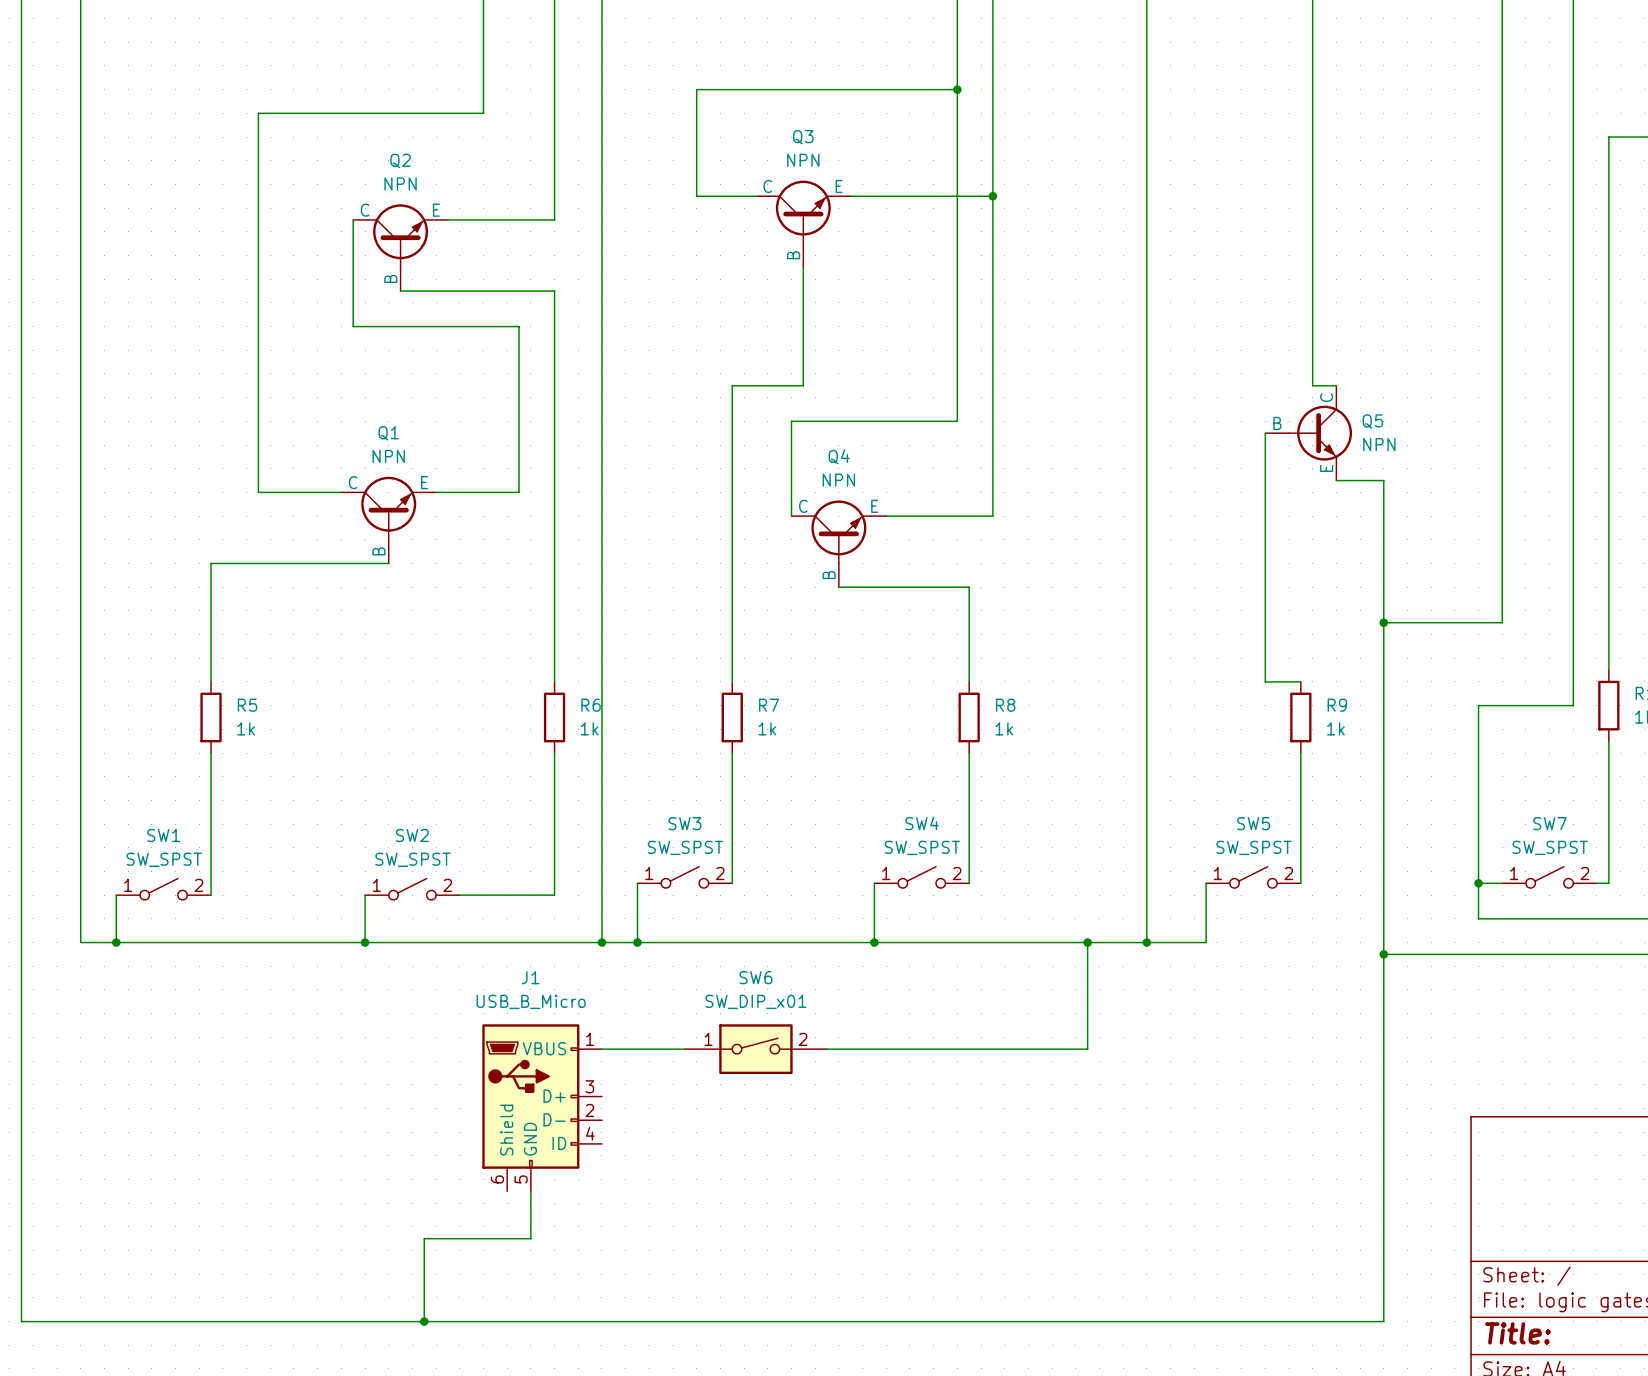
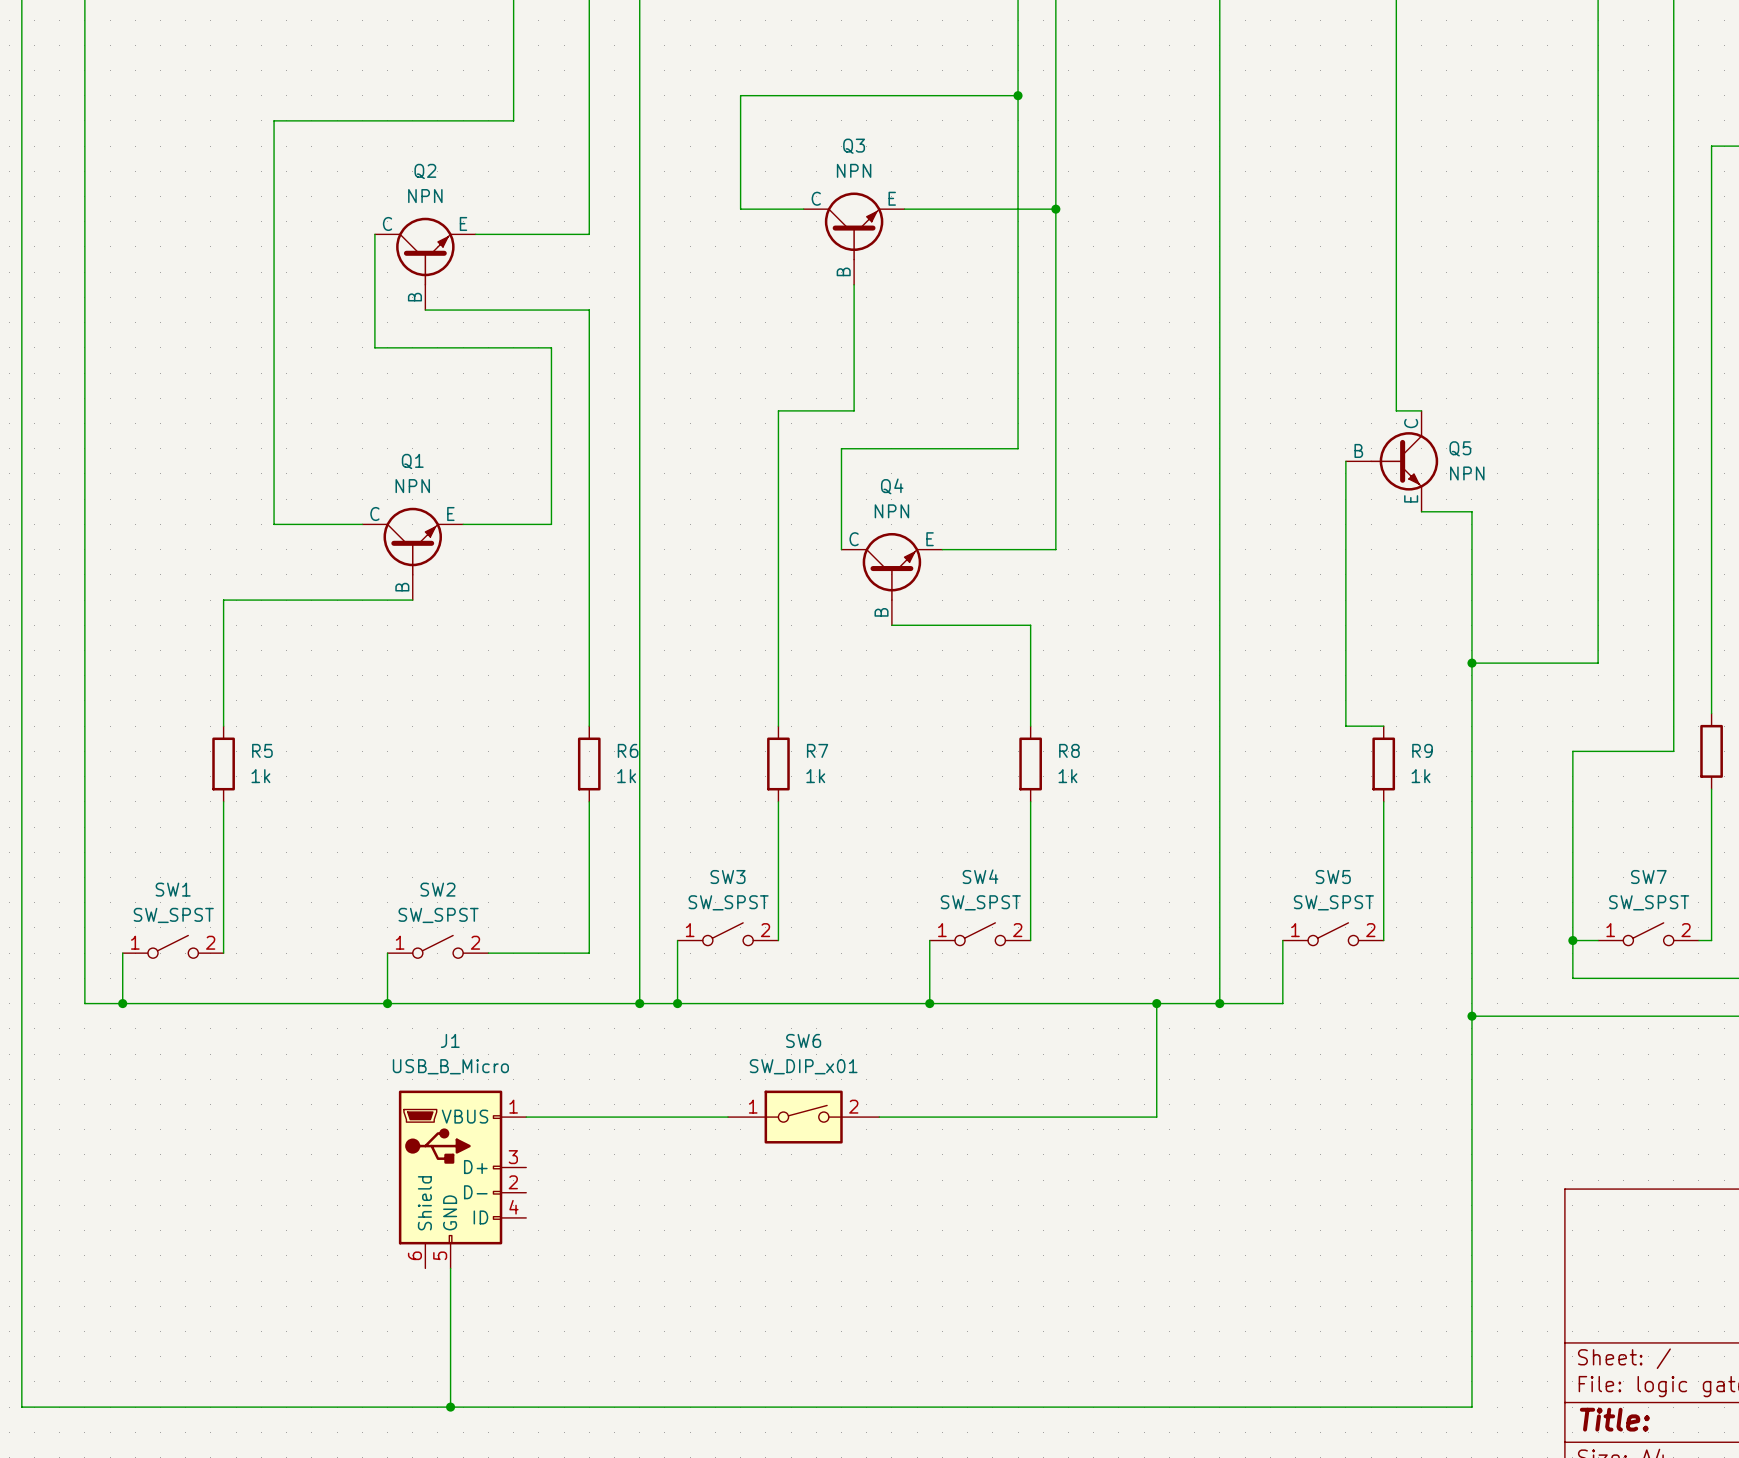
J1 position: (542, 1107) -> (462, 1179)
wire: (530, 1191) (530, 1238) (424, 1238) -> (450, 1268) (450, 1318)

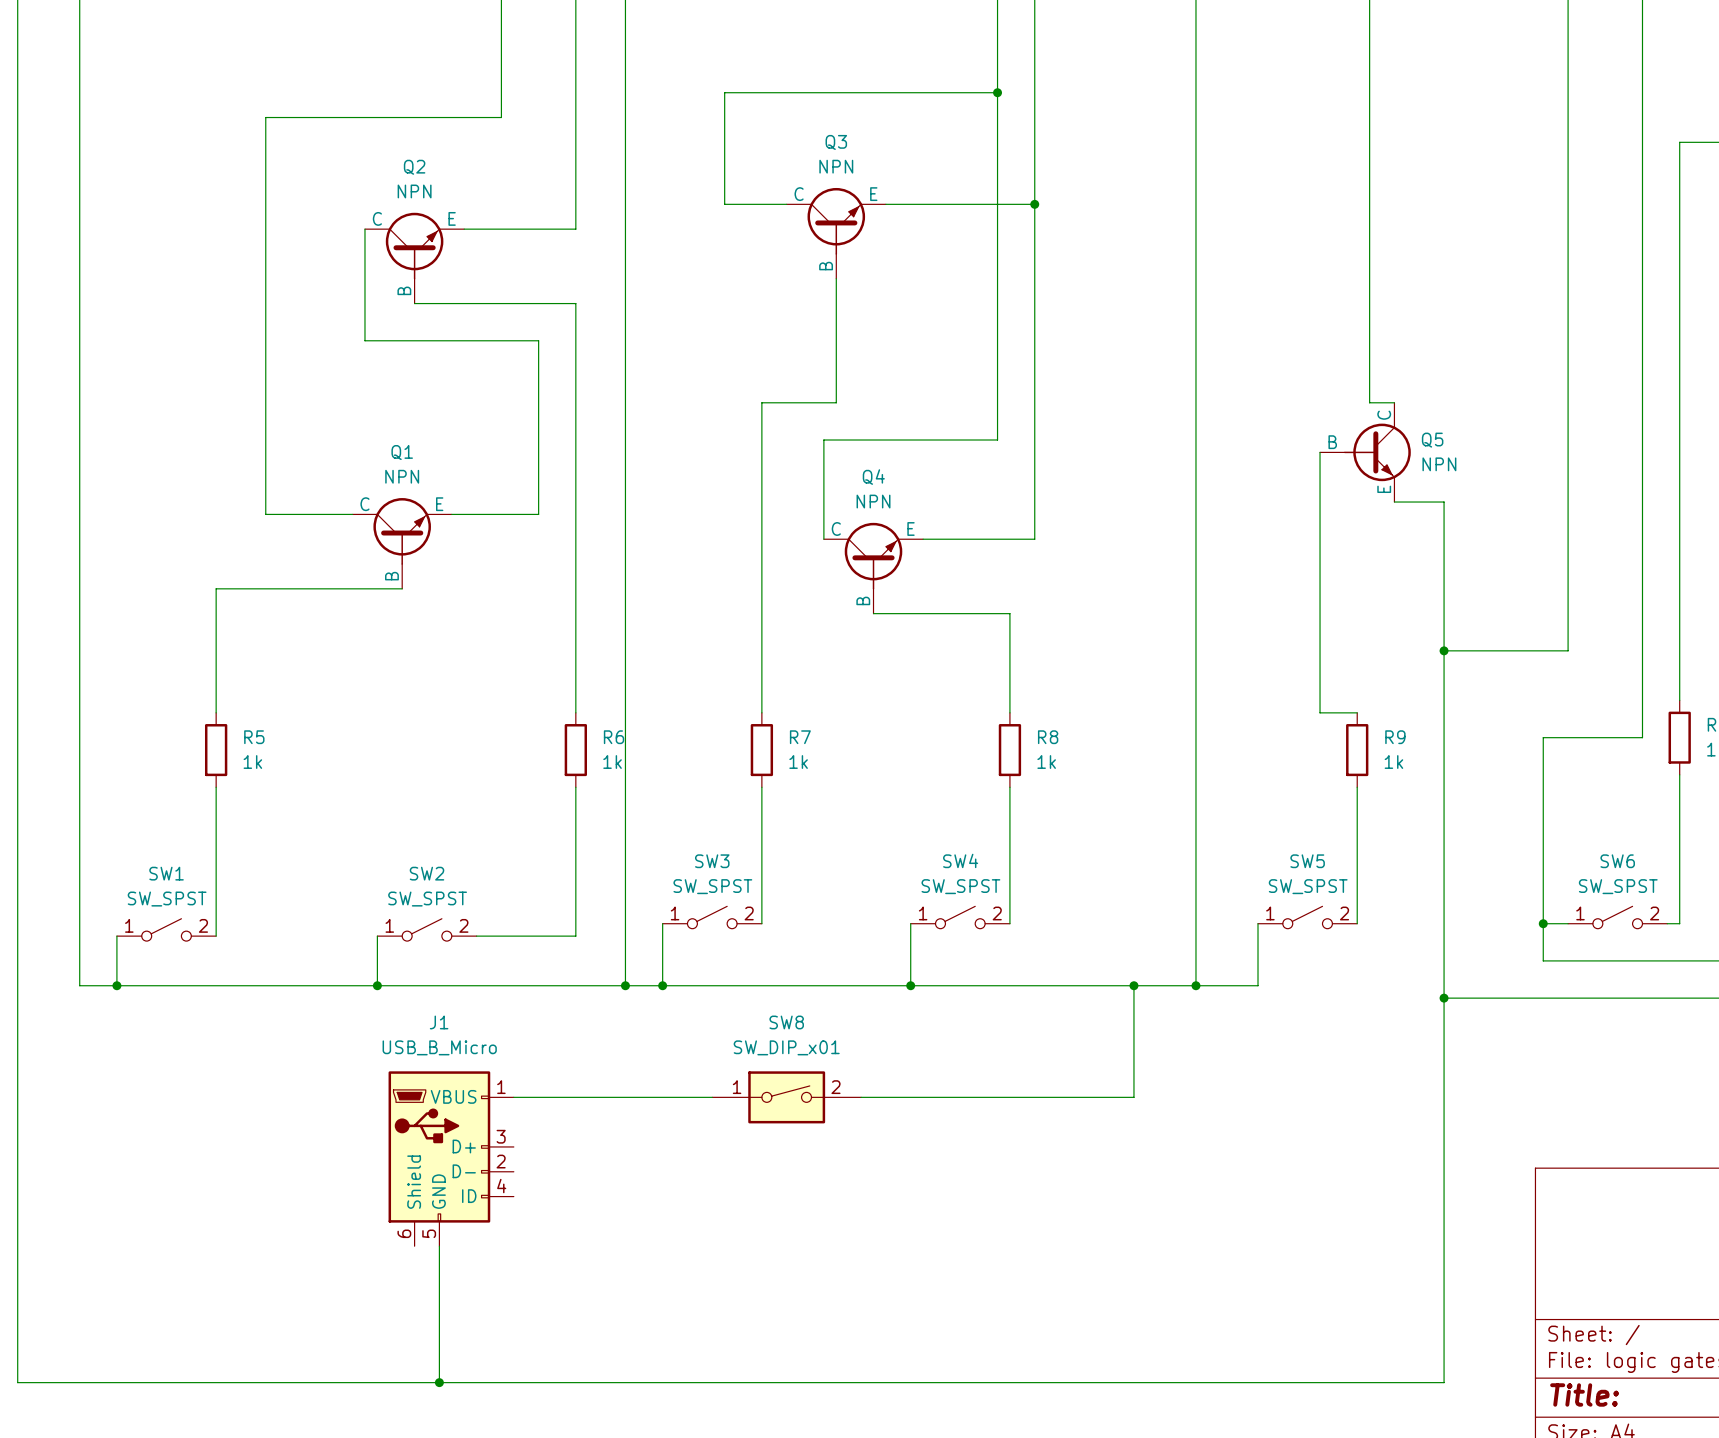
SW7 name: SW7 (1648, 877) -> SW6 (1617, 861)
SW6 name: SW6 (803, 1040) -> SW8 (786, 1022)

